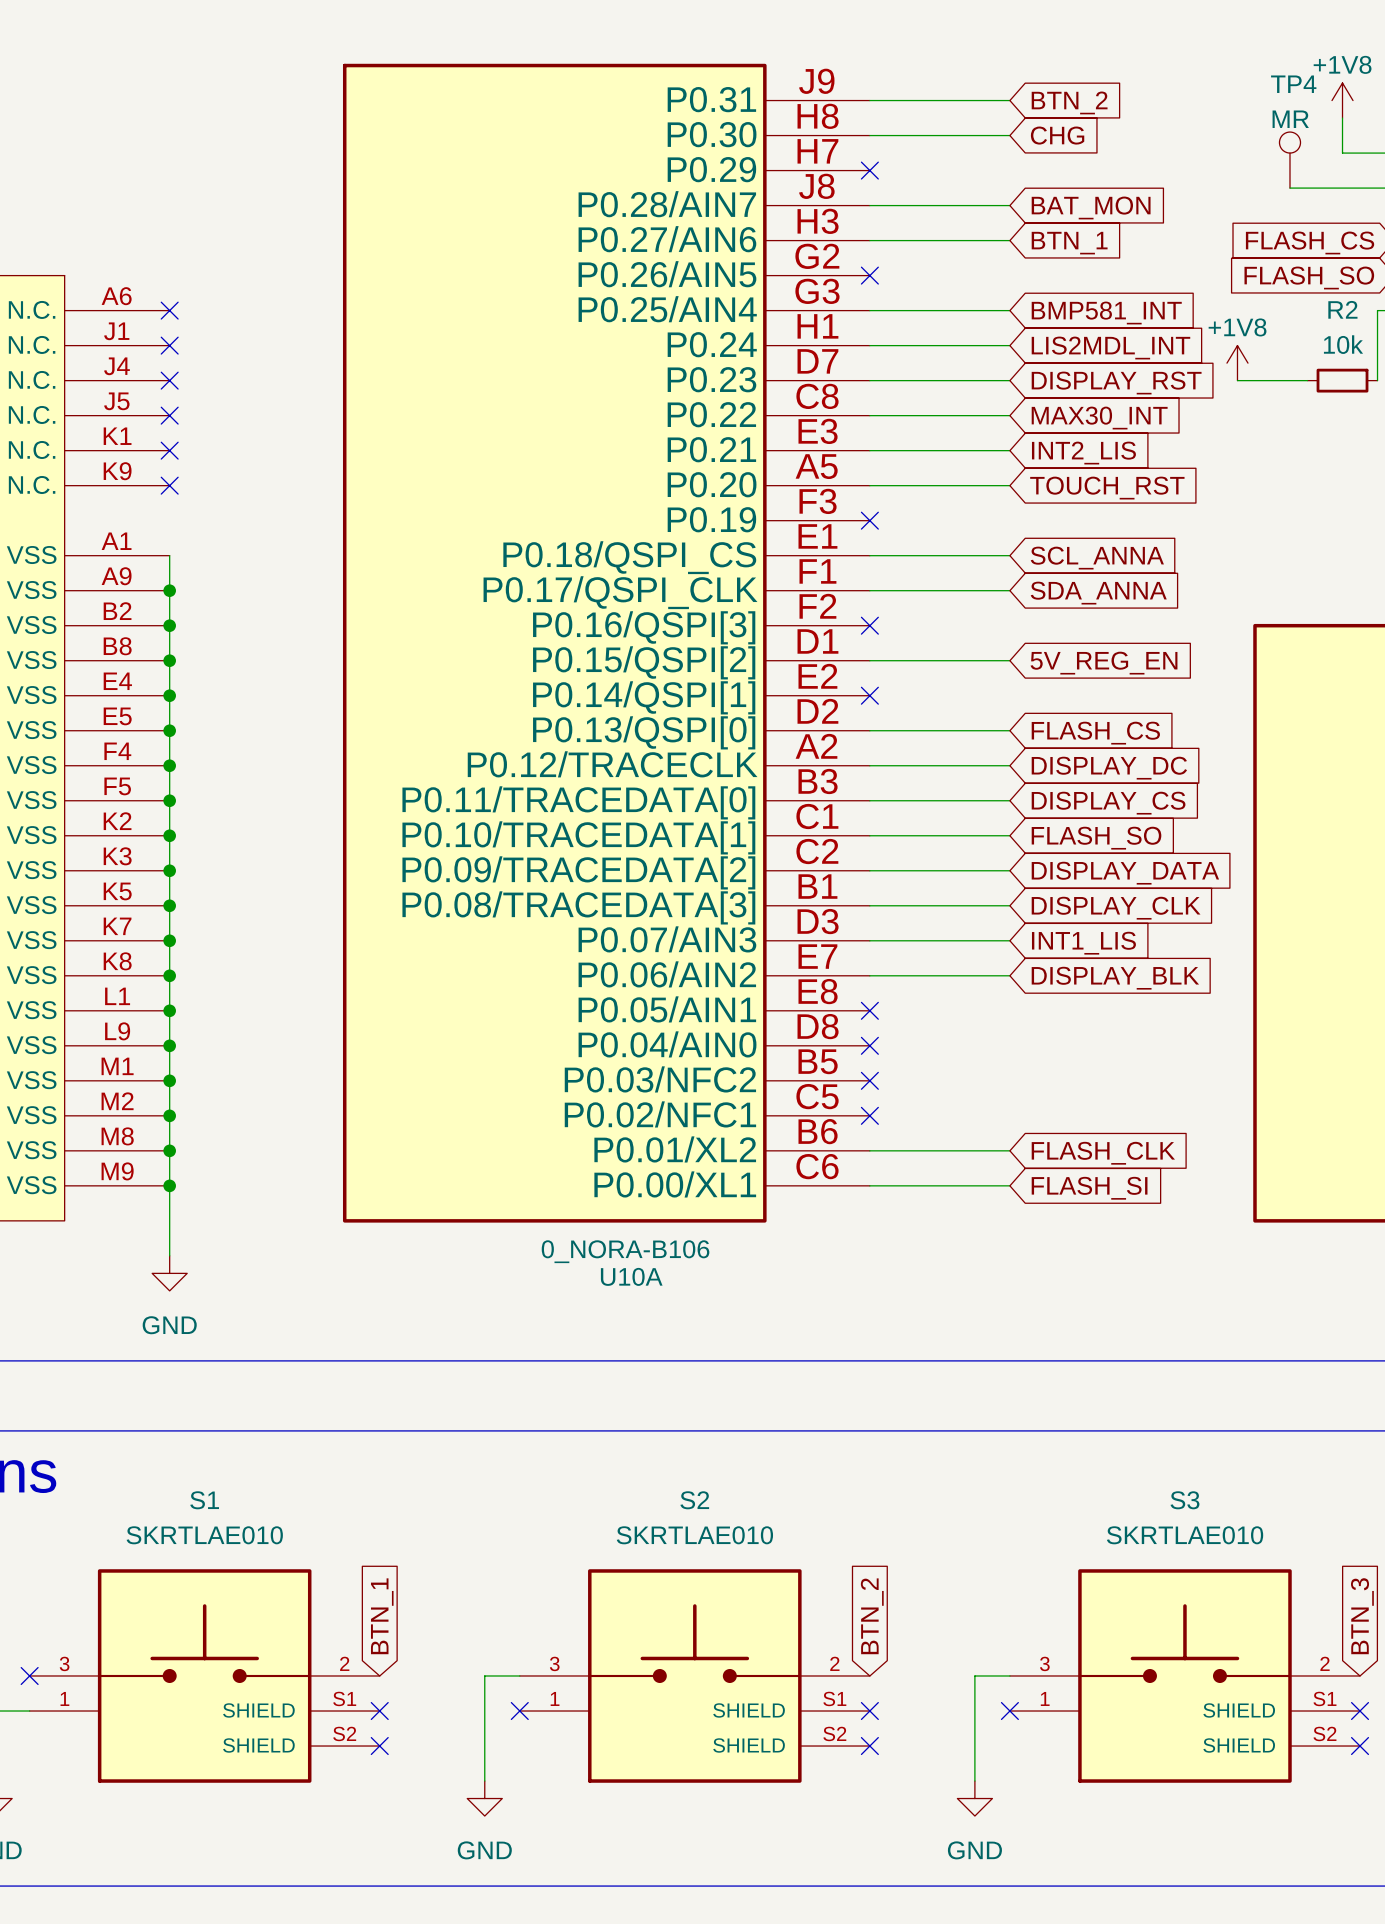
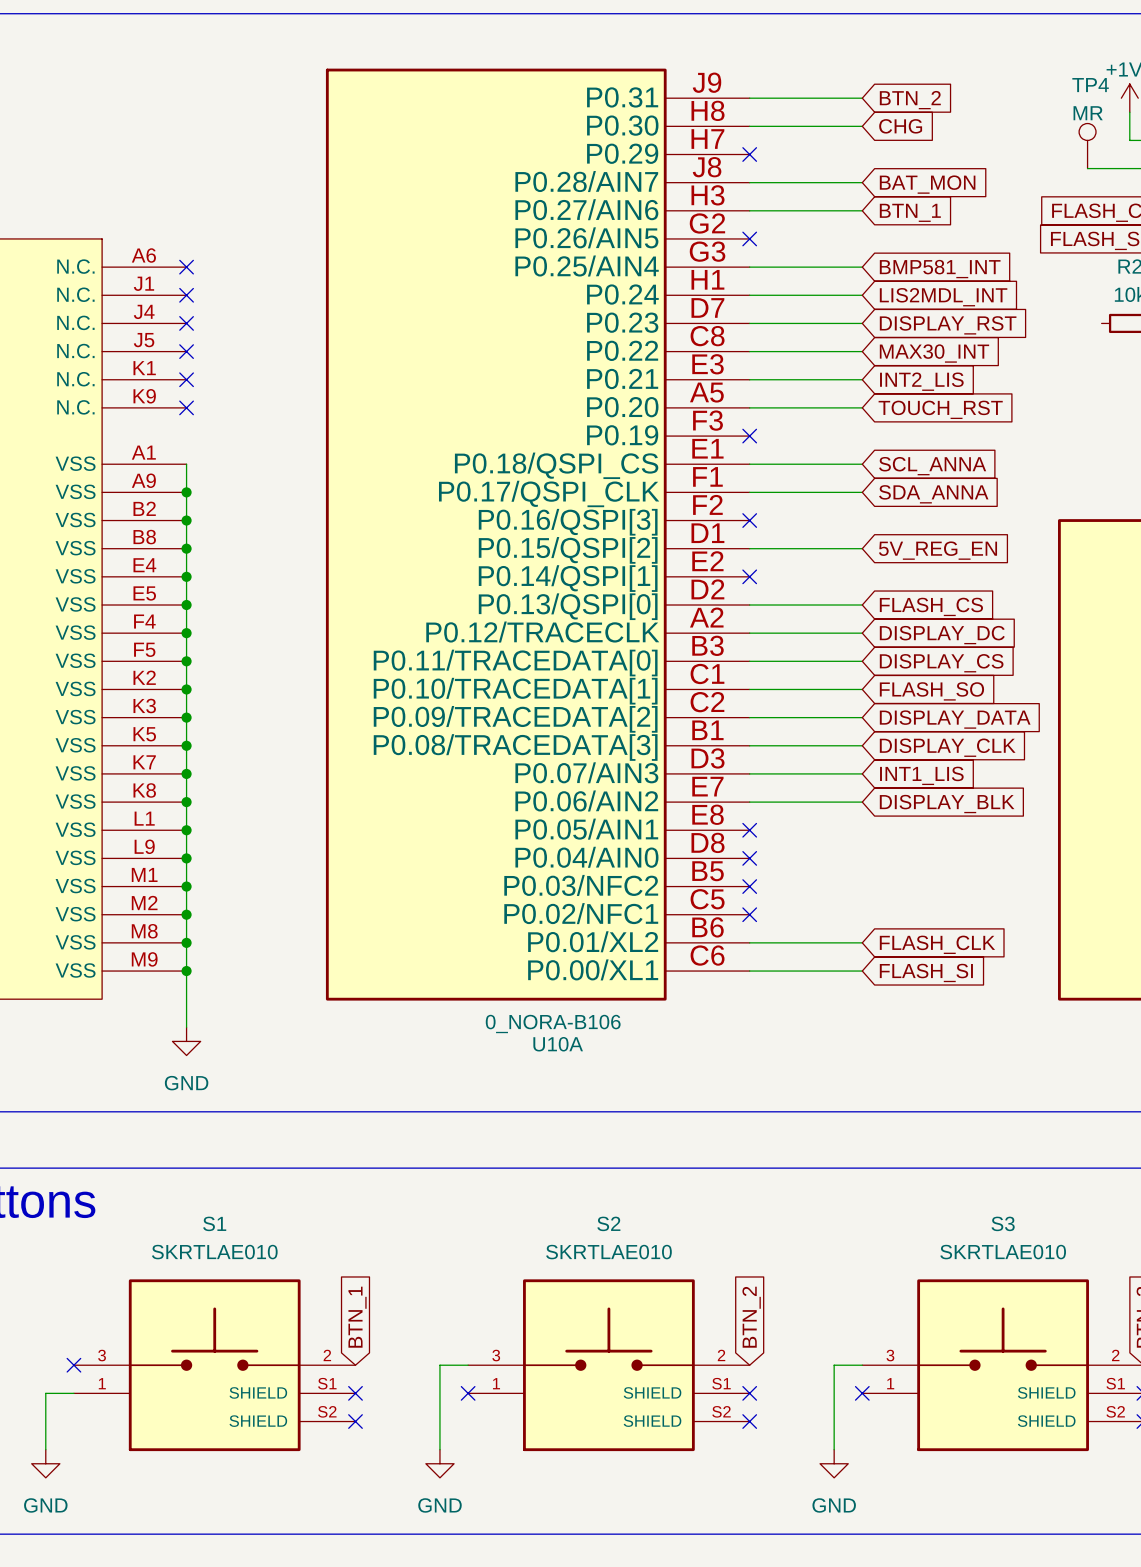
power symbol: +1V8 (1237, 363) -> none
wire: (1237, 380) (1307, 380) -> none

